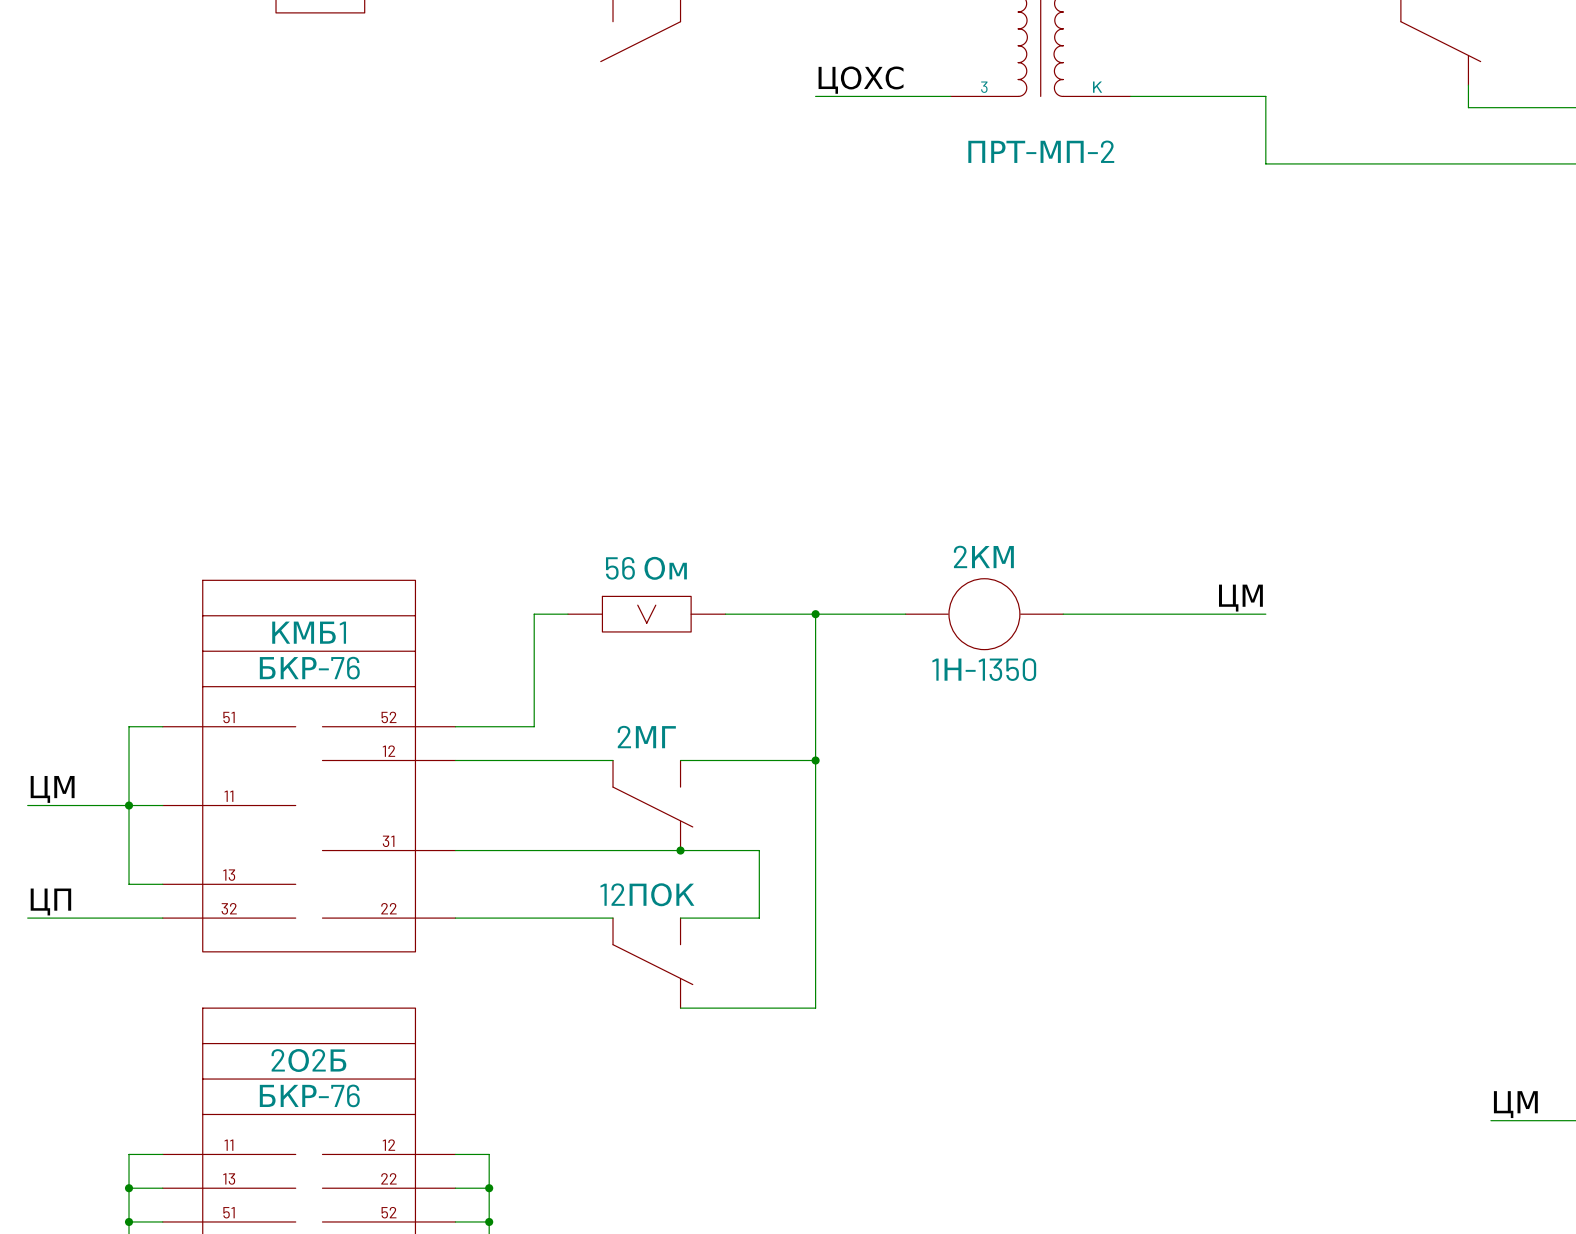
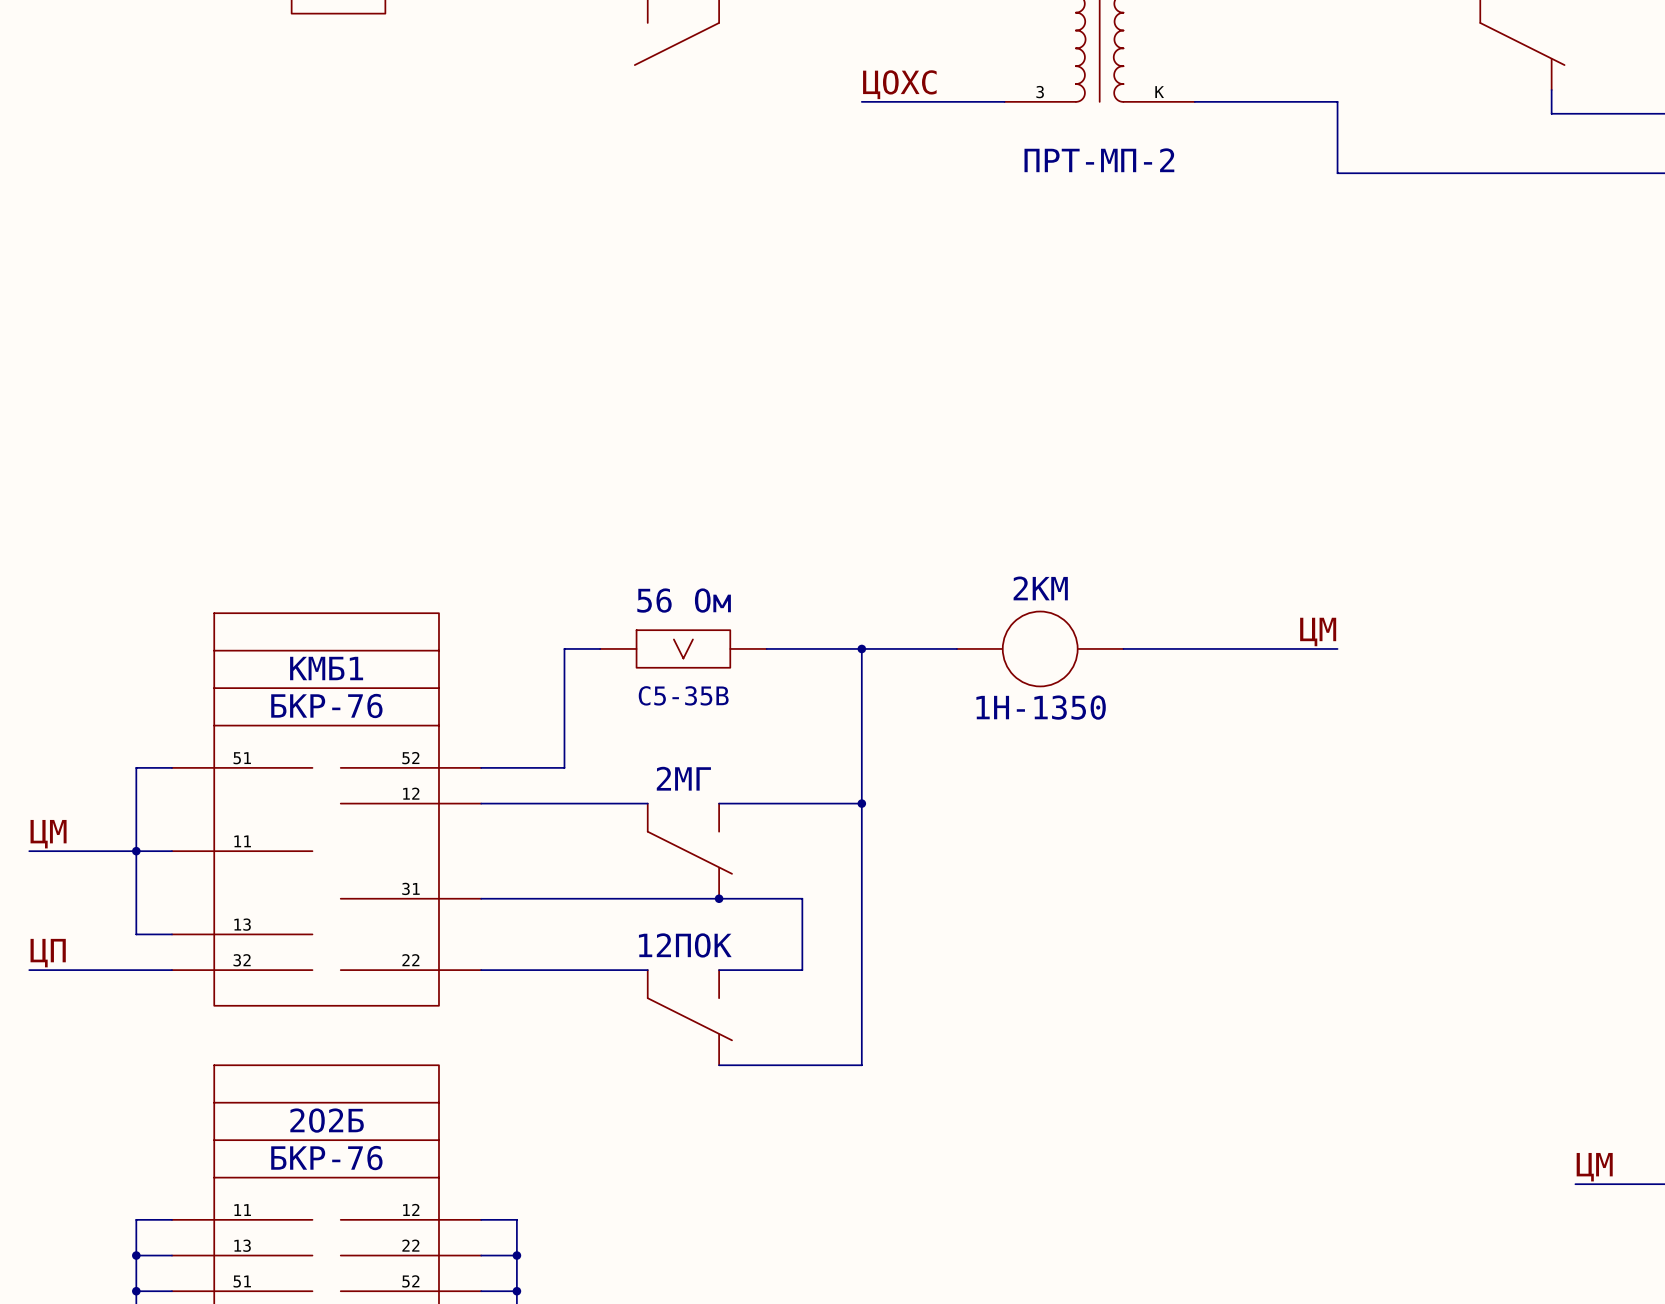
part text: none -> C5-35В (683, 695)

